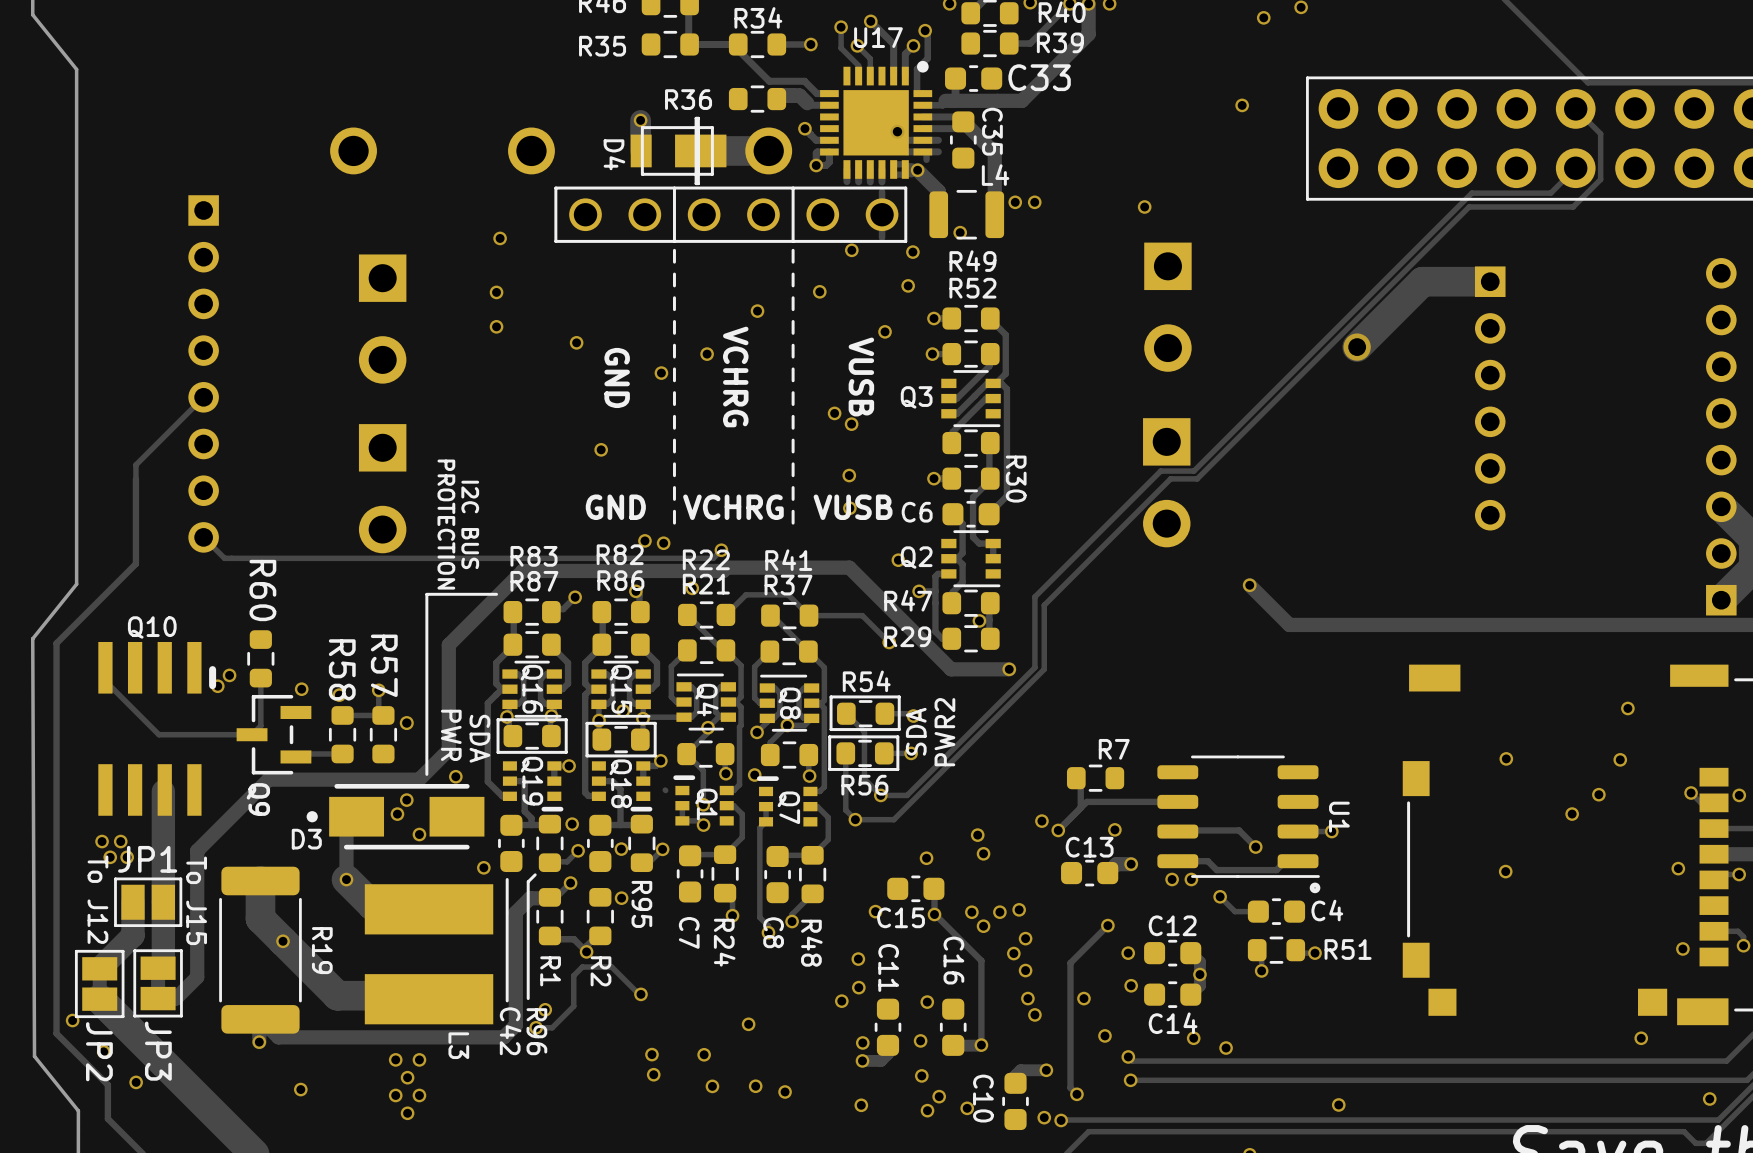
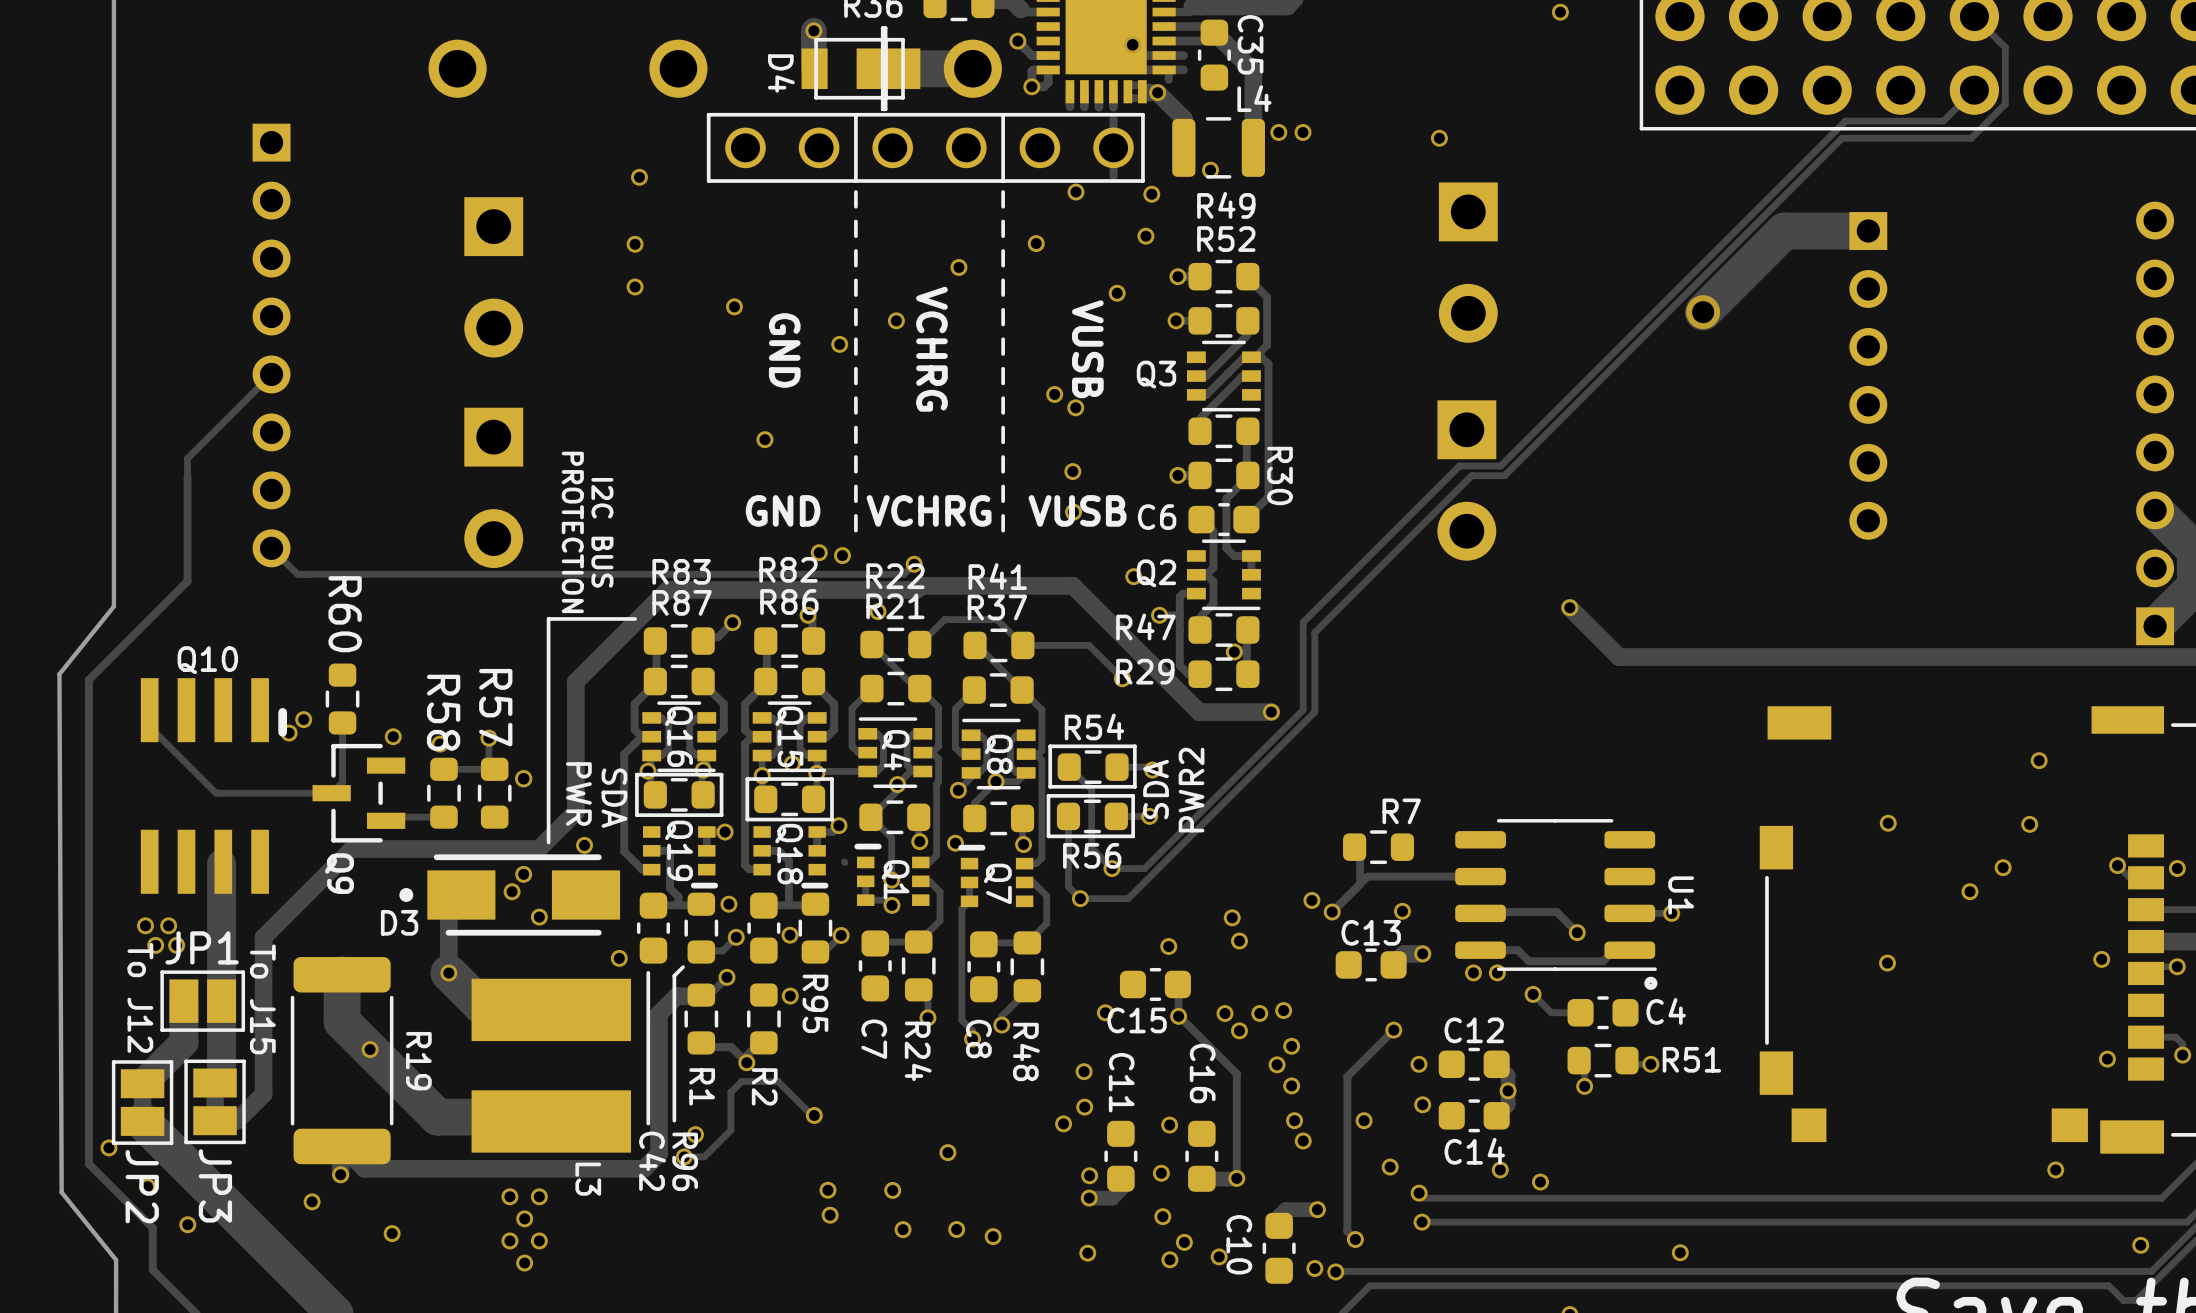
via: none -> (312, 1201)

